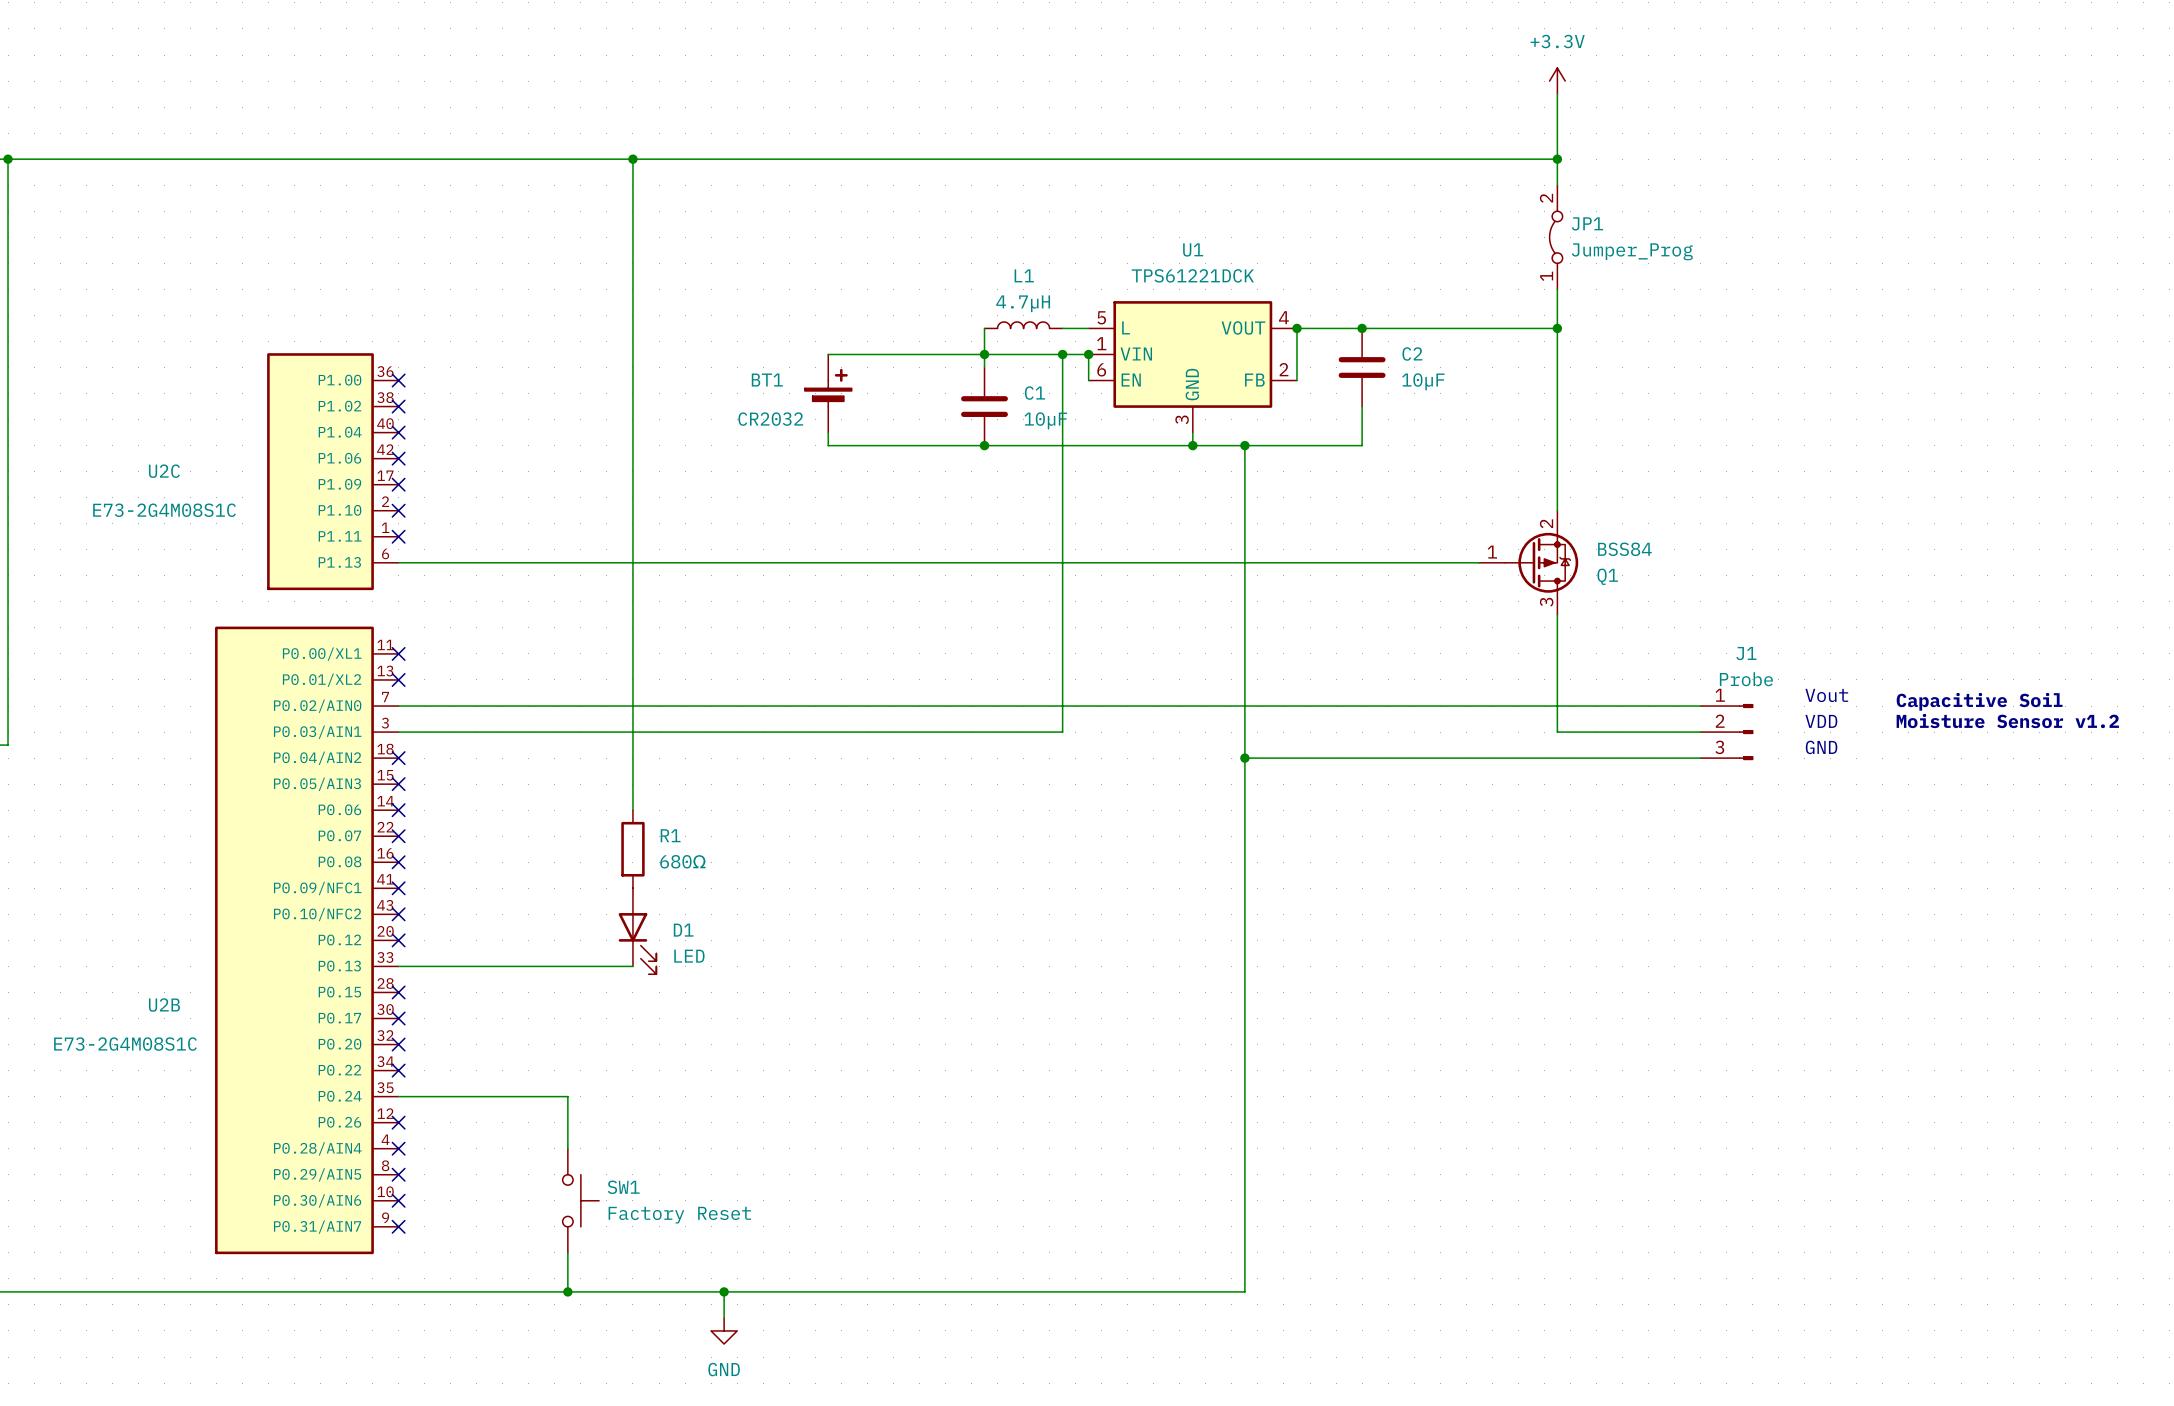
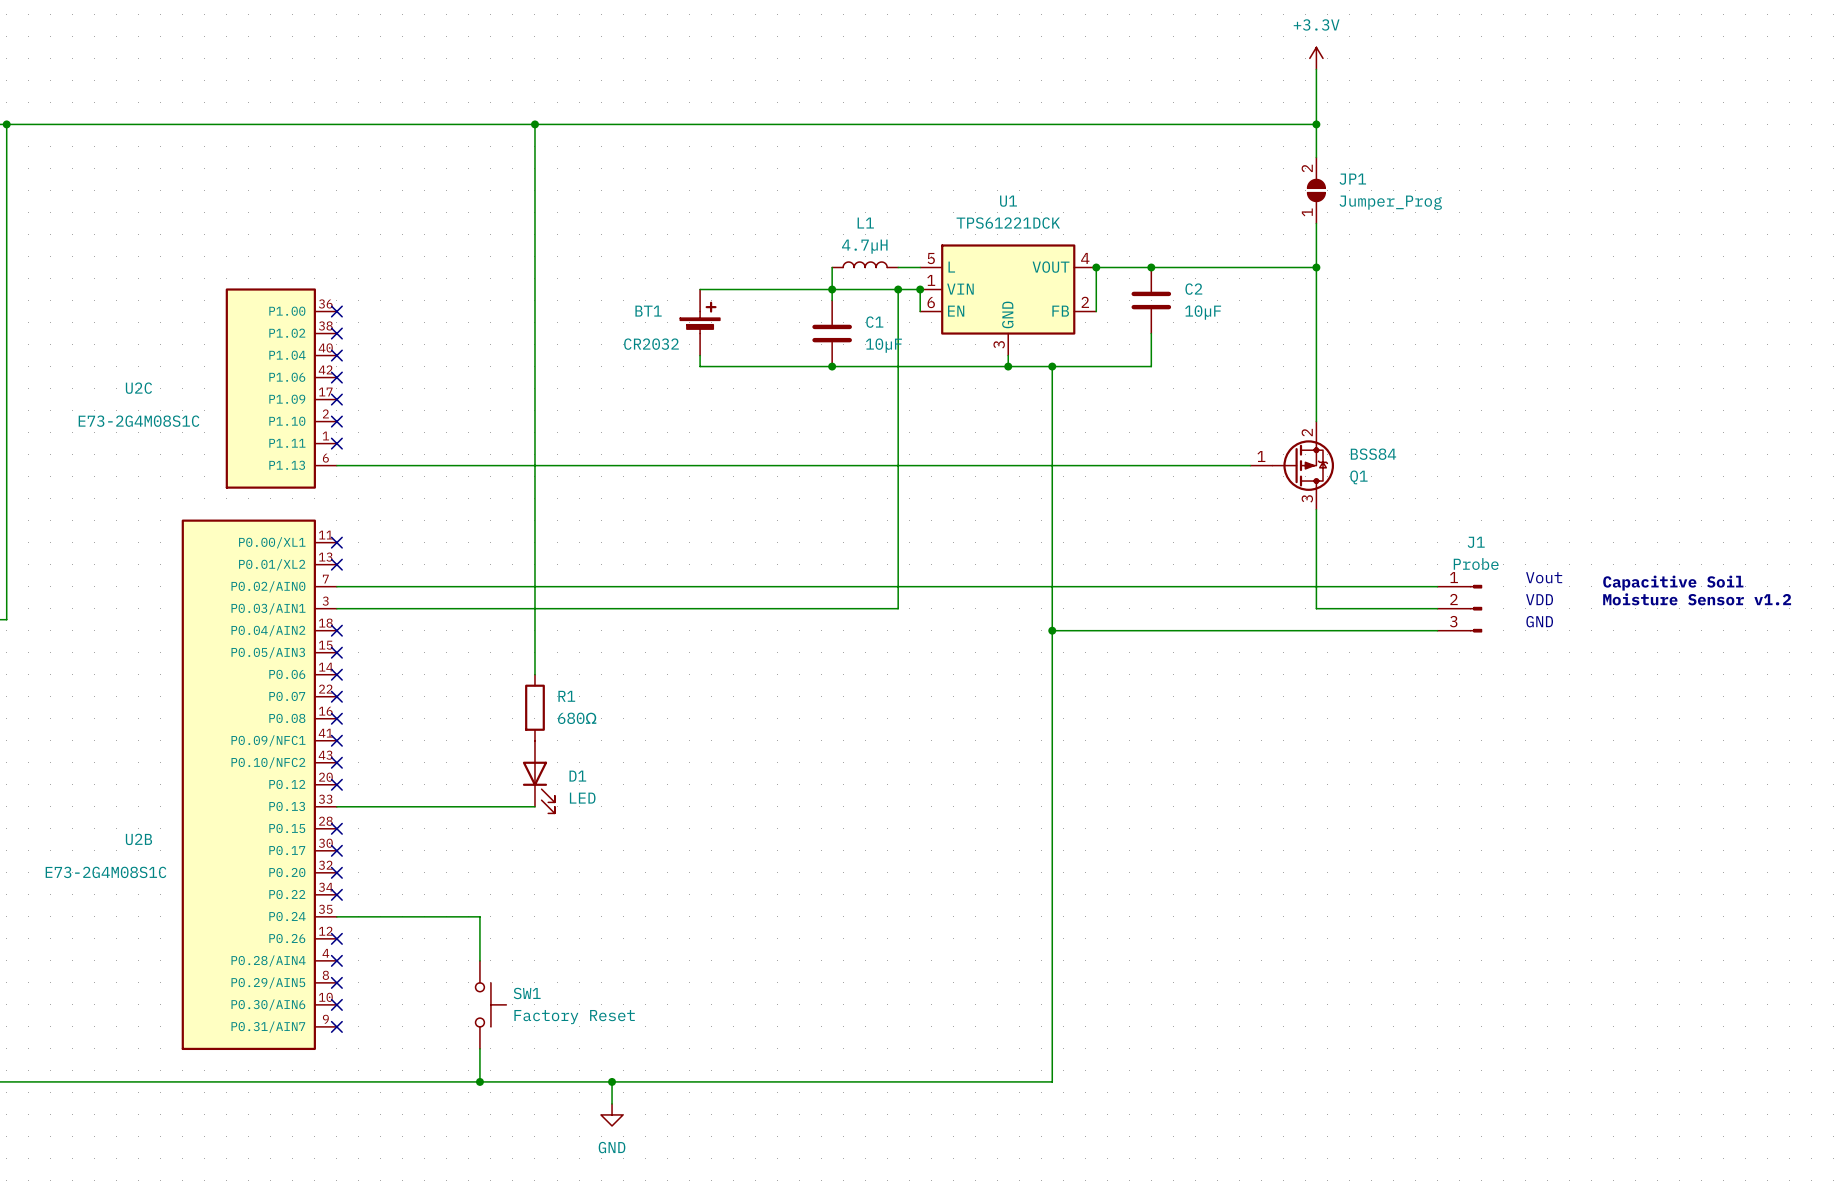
JP1 symbol: [1549, 185, 1563, 290] -> [1307, 157, 1326, 224]

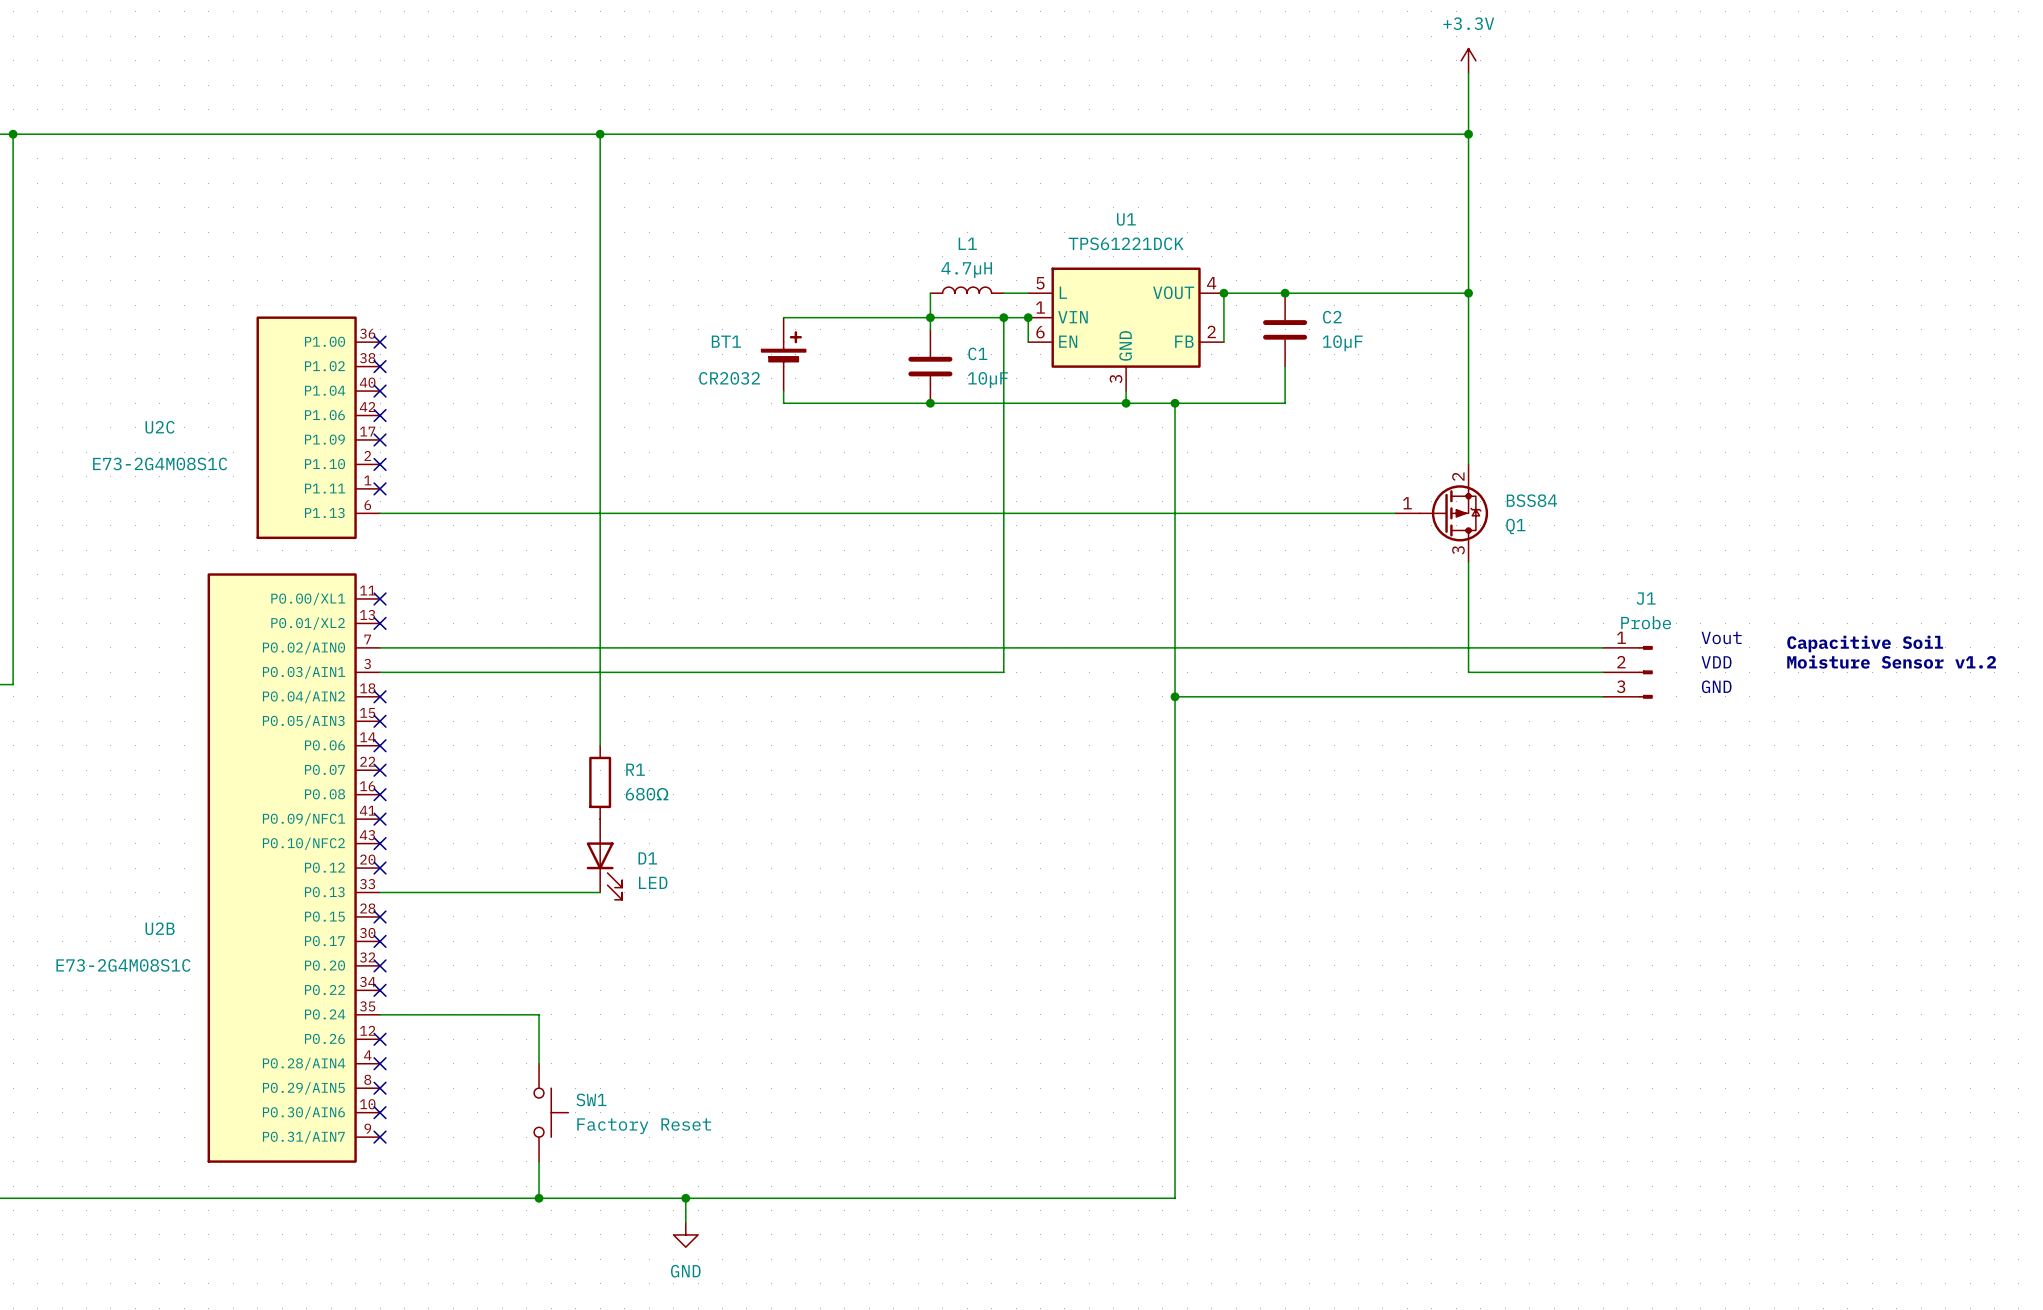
JP1: Jumper_Prog (1316, 190) -> none

